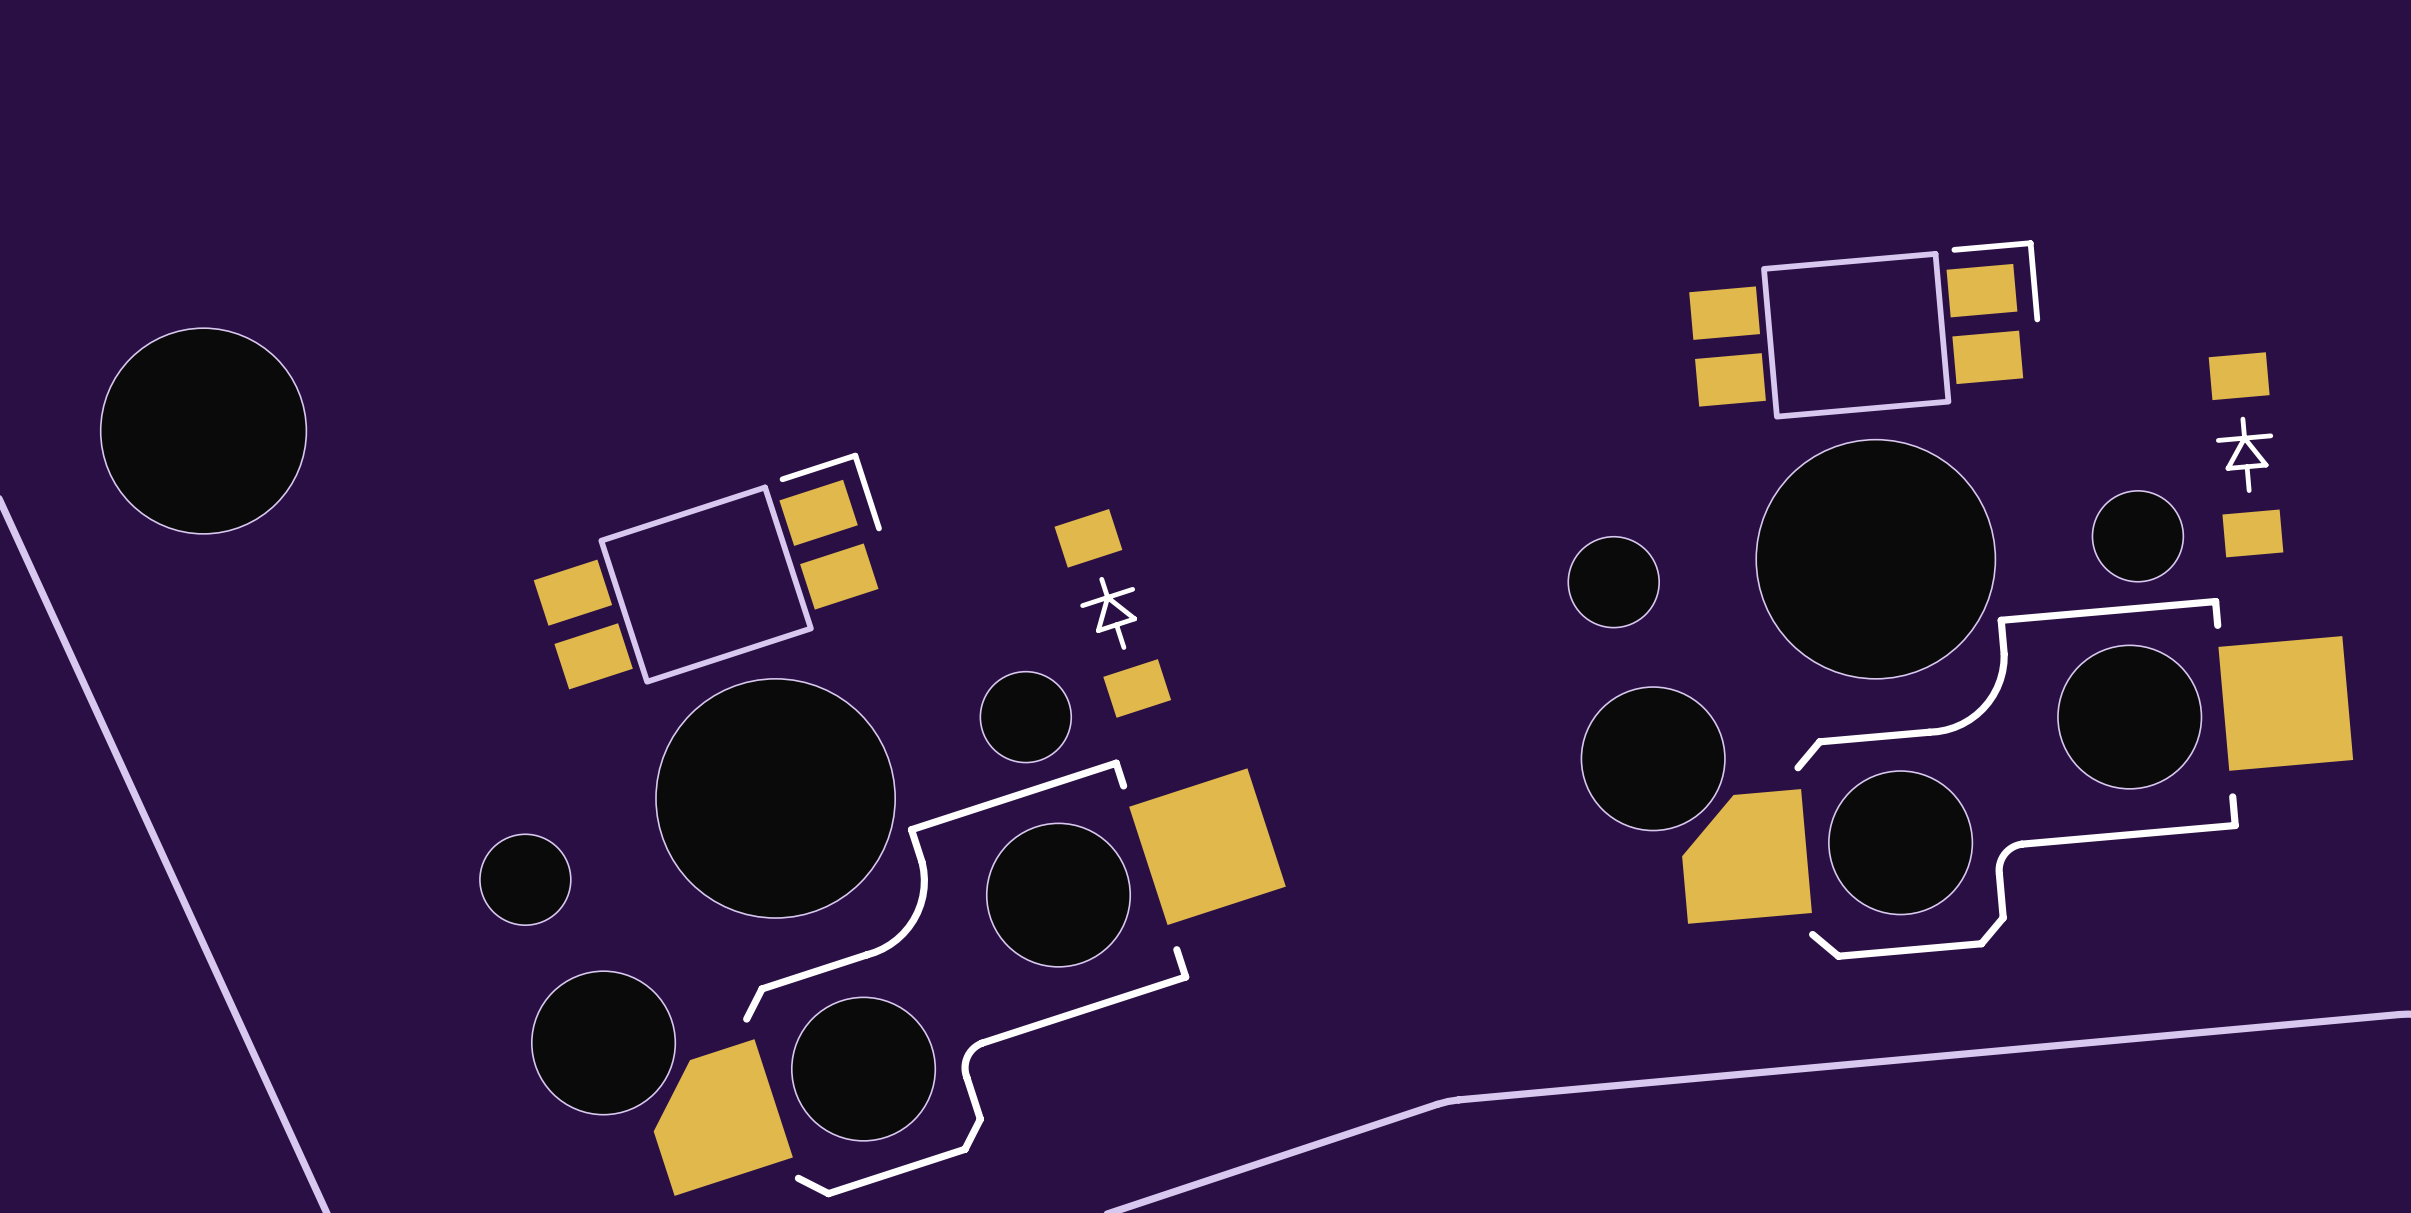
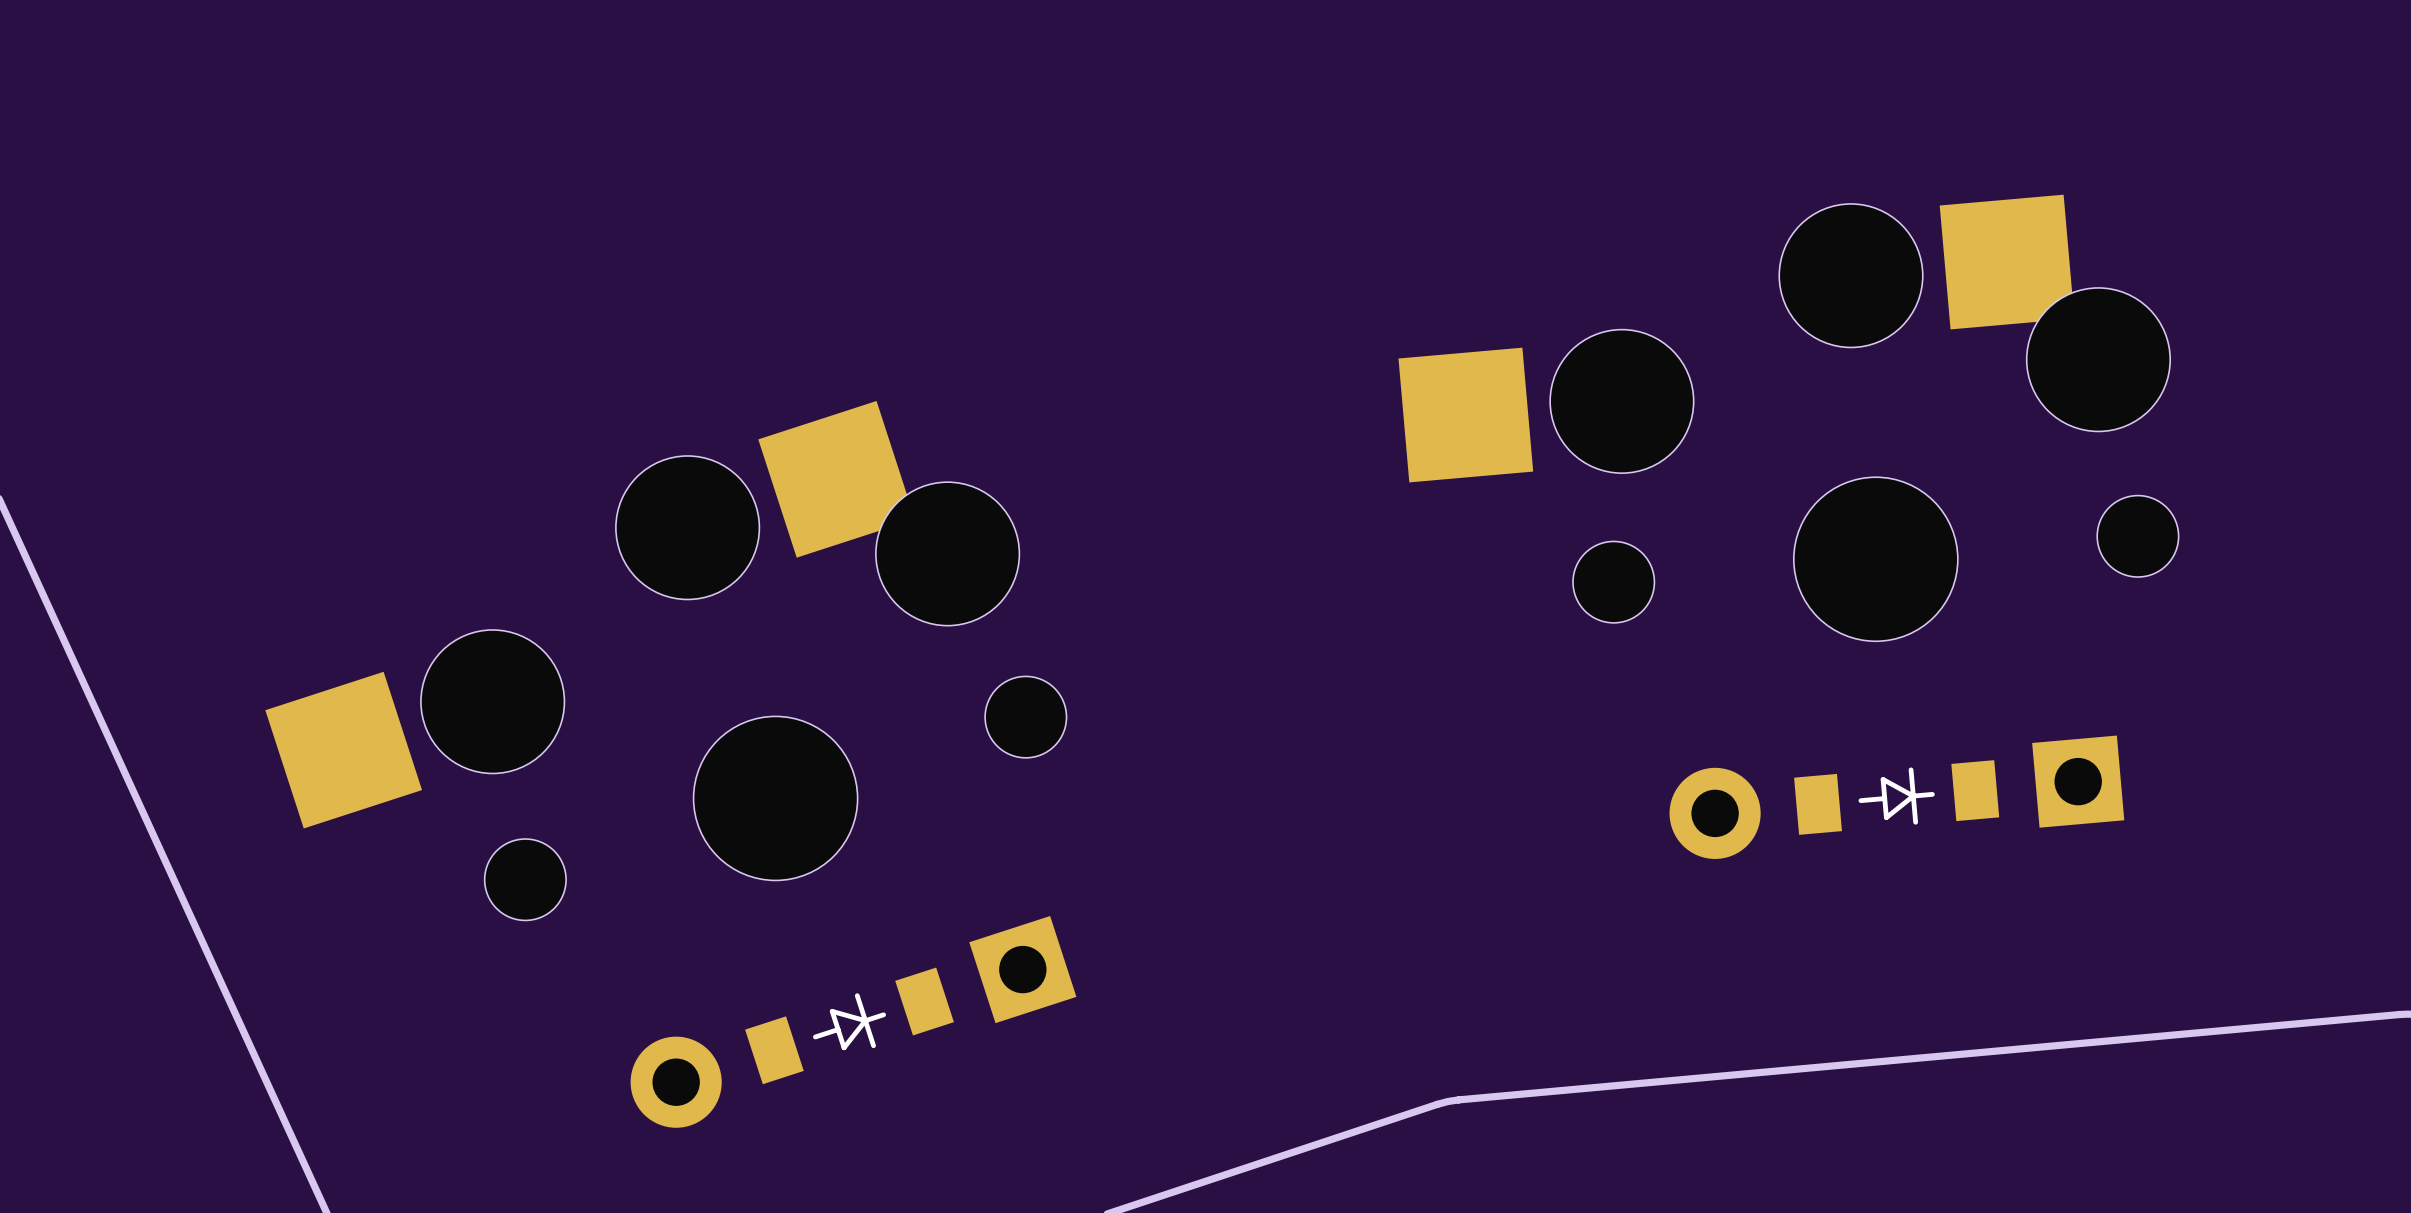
part: (1864, 329) -> none
part: none -> (1788, 417)
part: (203, 431) -> none
part: (2246, 454) -> none
part: (707, 571) -> none
part: (1112, 613) -> none
part: none -> (665, 660)
part: (1960, 699) -> none
part: none -> (1896, 797)
part: (882, 934) -> none
part: none -> (853, 1021)

